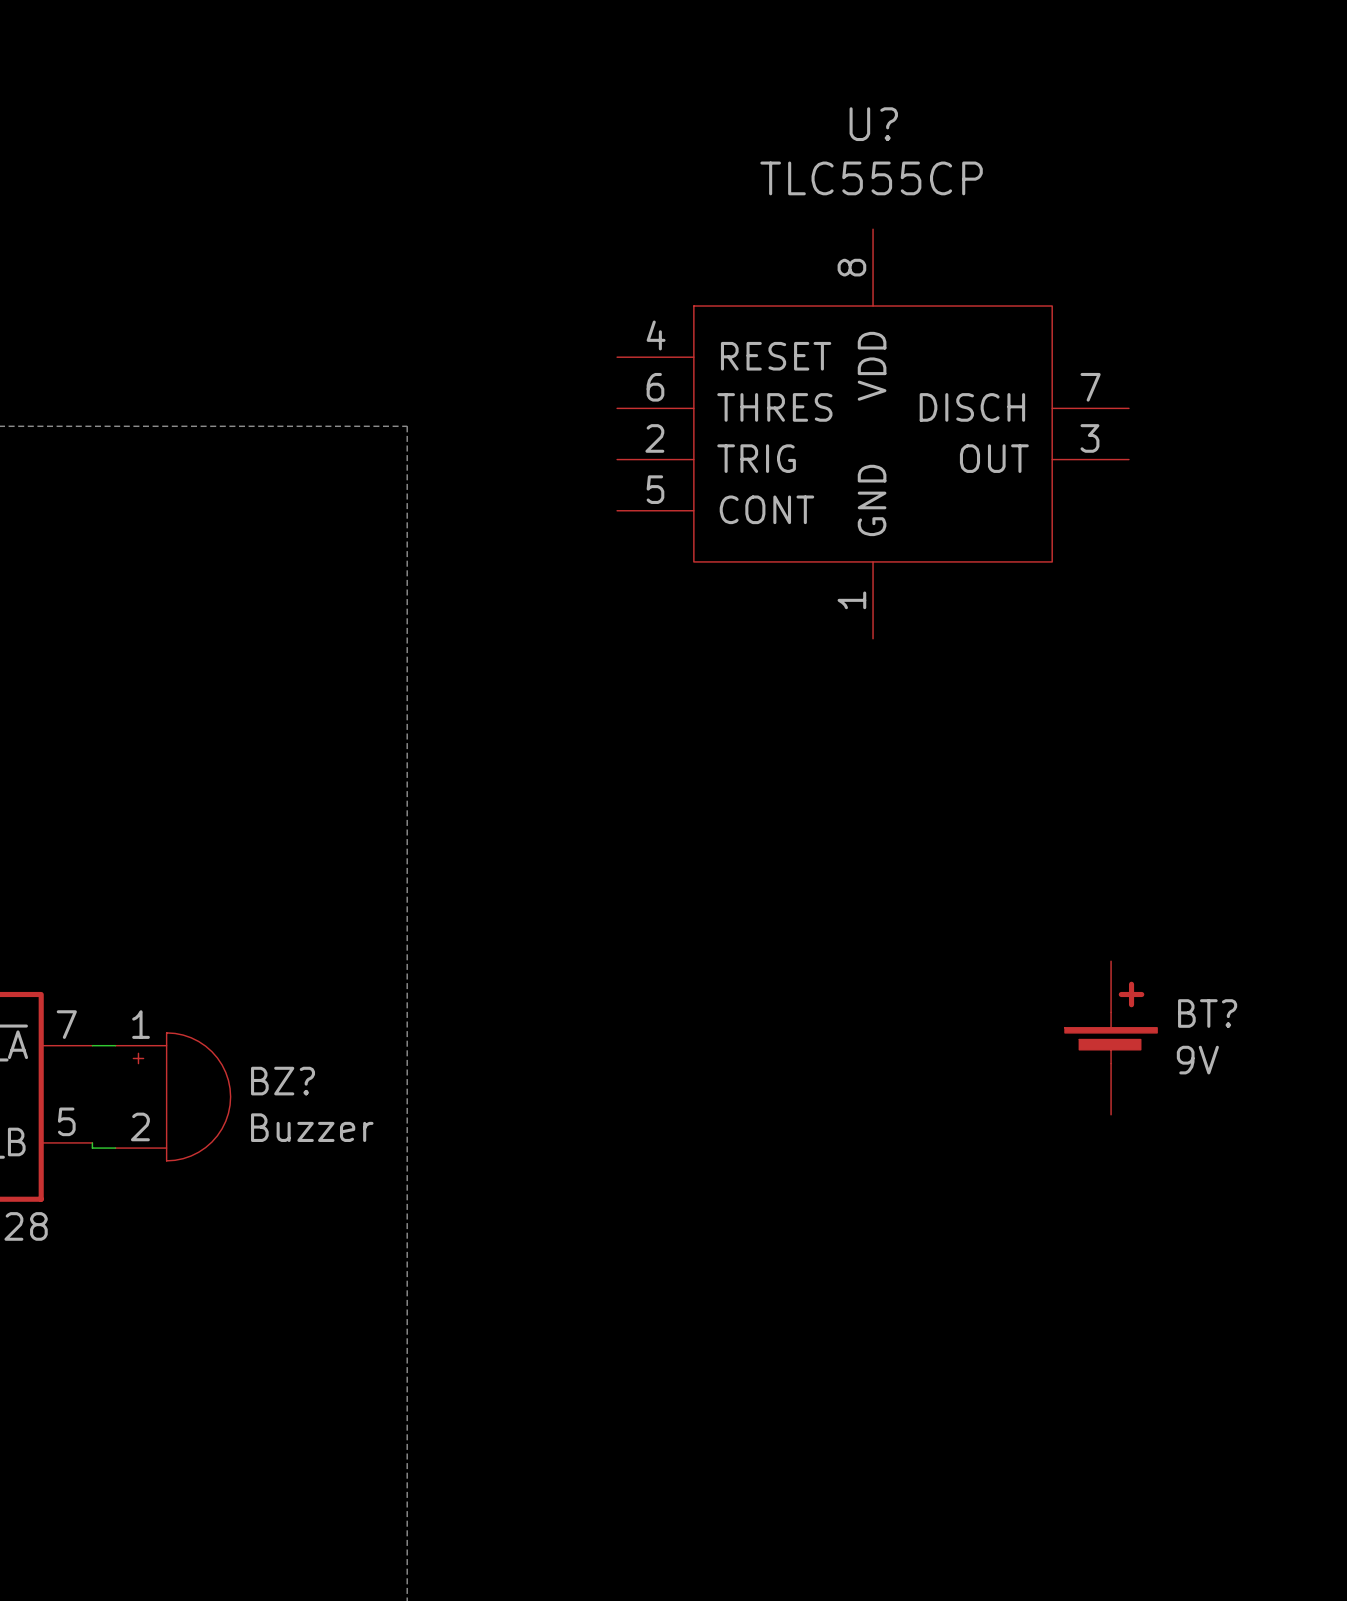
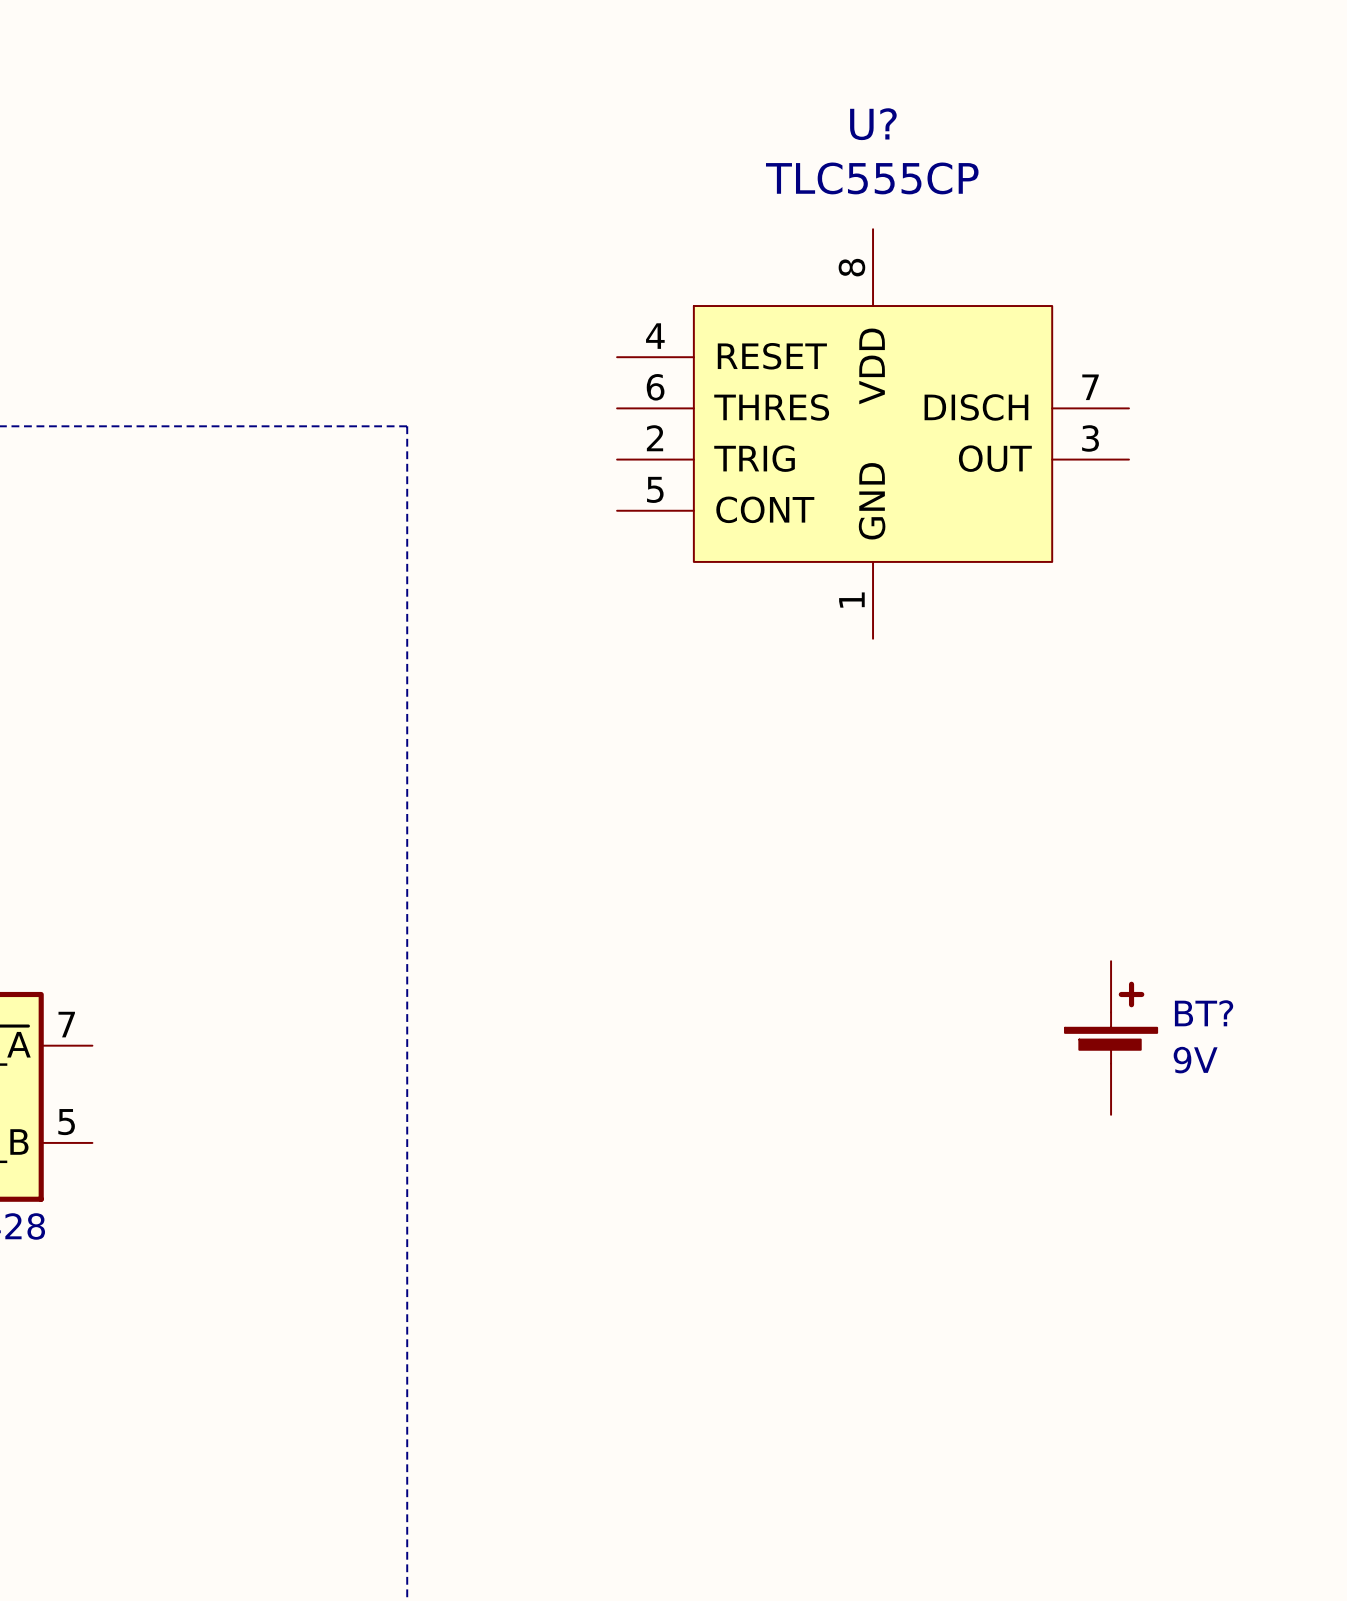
wire: (92, 1045) (115, 1045) -> none
BZ?: Buzzer (173, 1096) -> none
wire: (92, 1142) (92, 1148) (115, 1148) -> none

